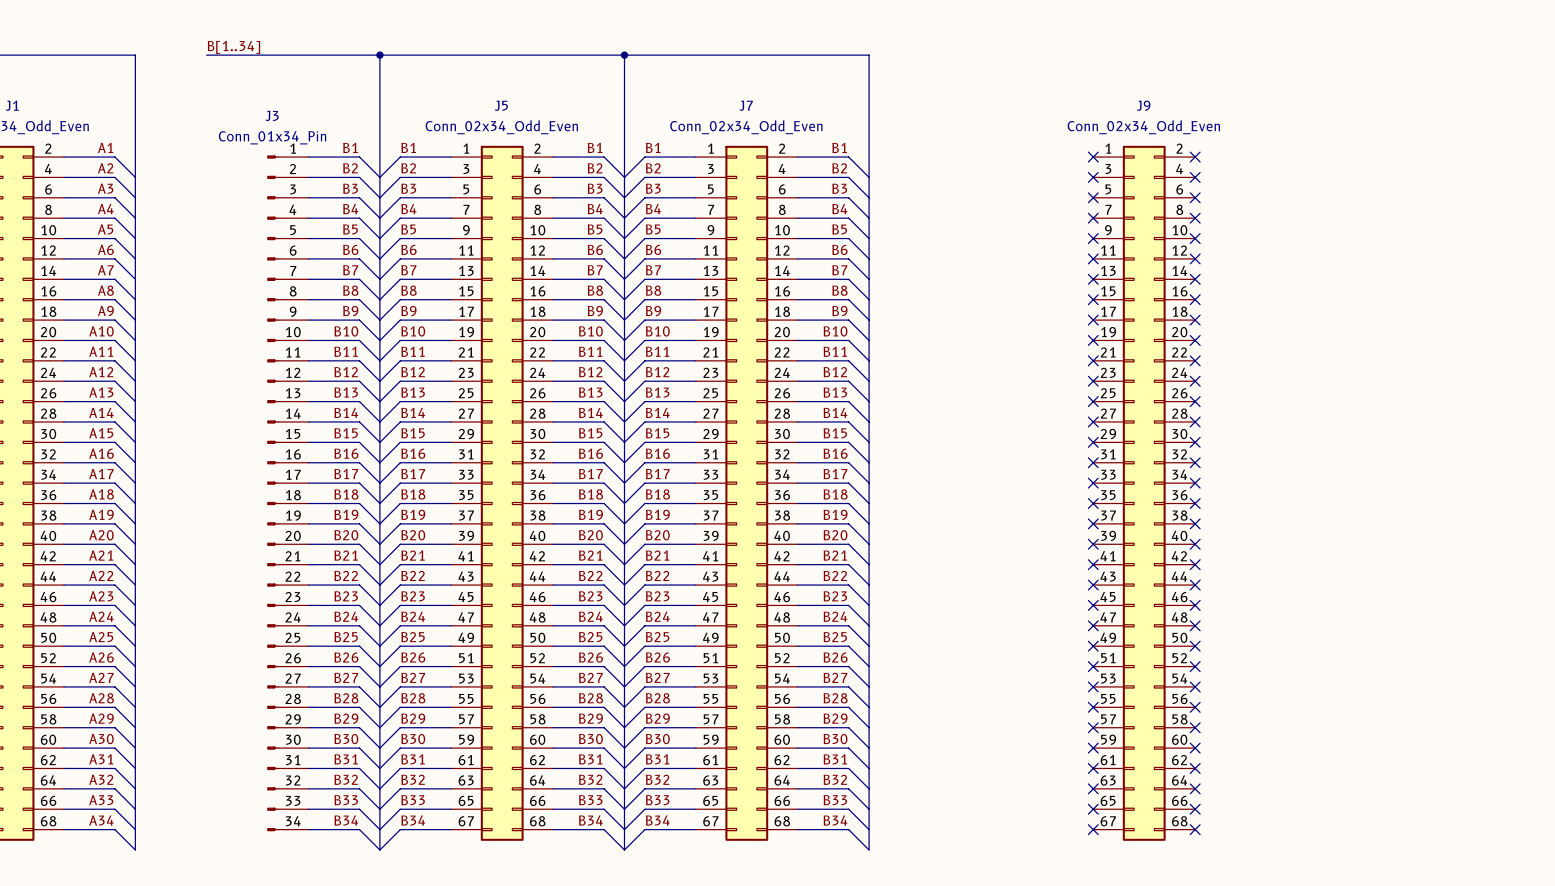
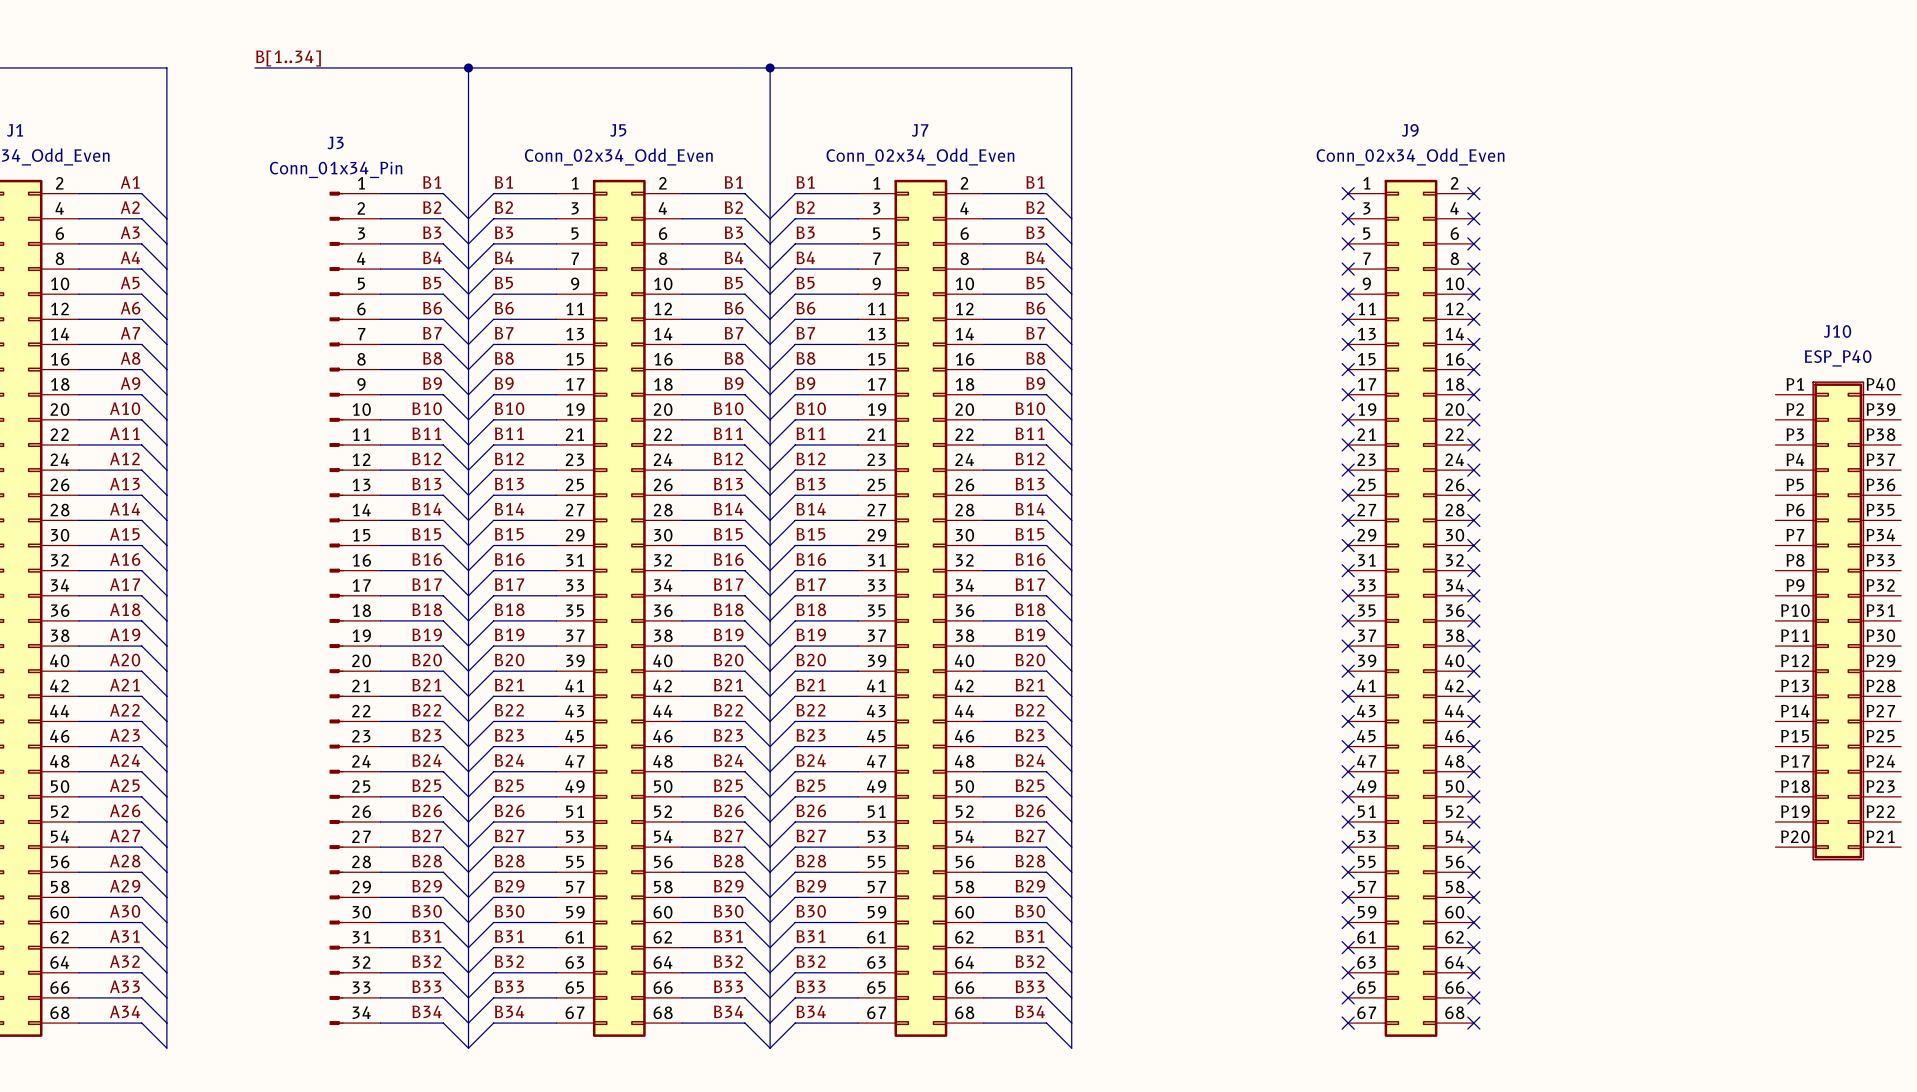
J10: none -> ESP_P40 (1838, 620)

